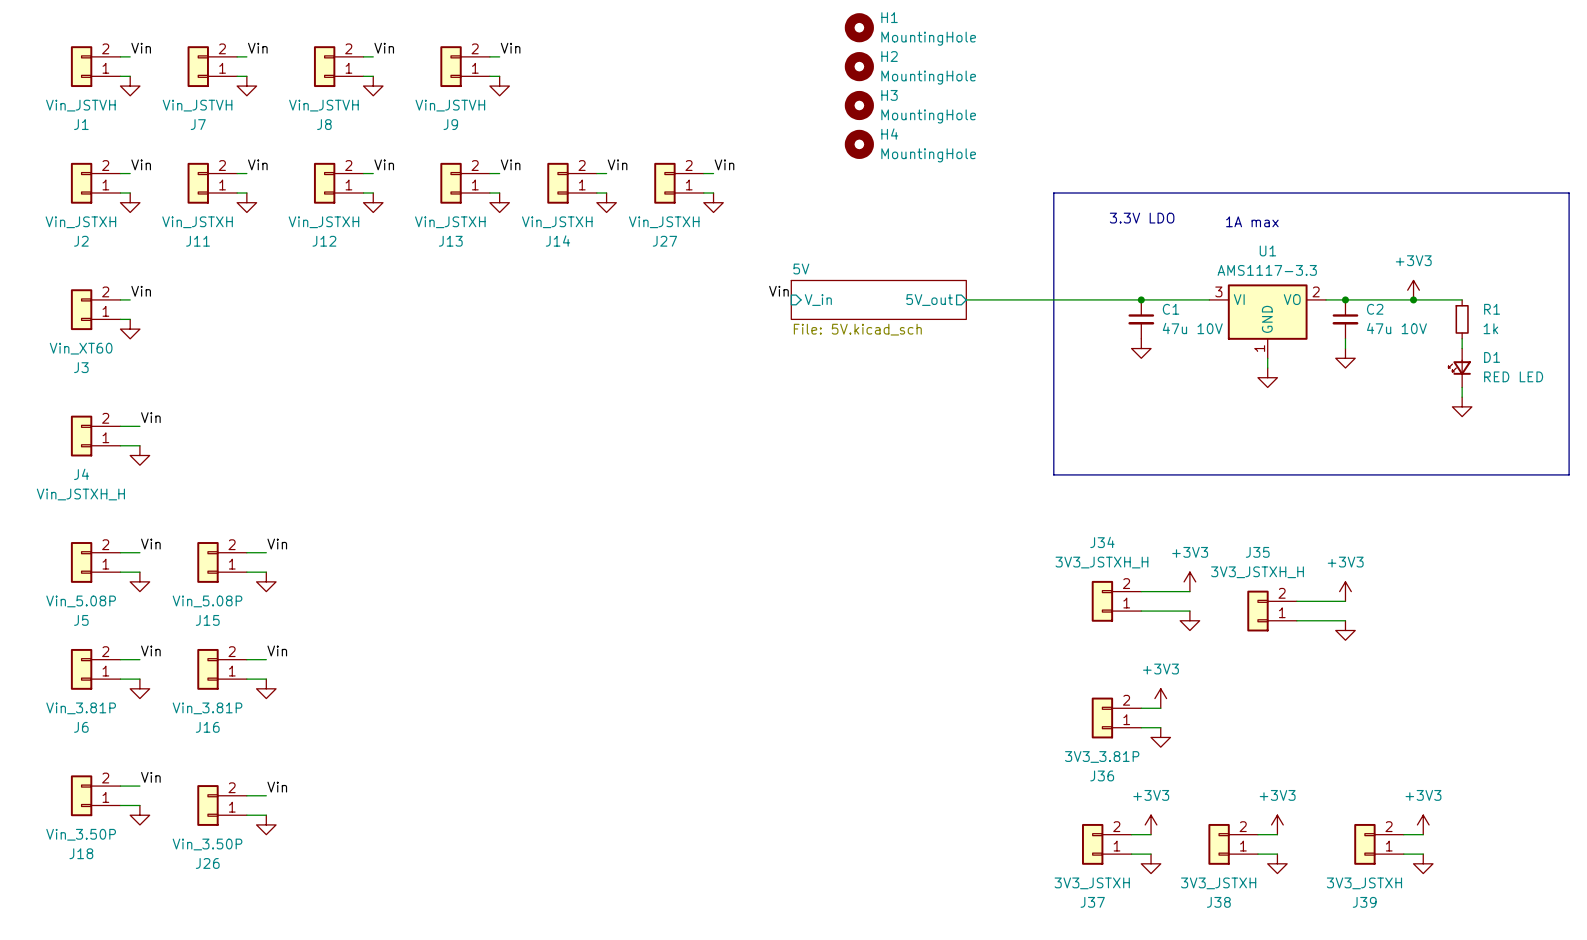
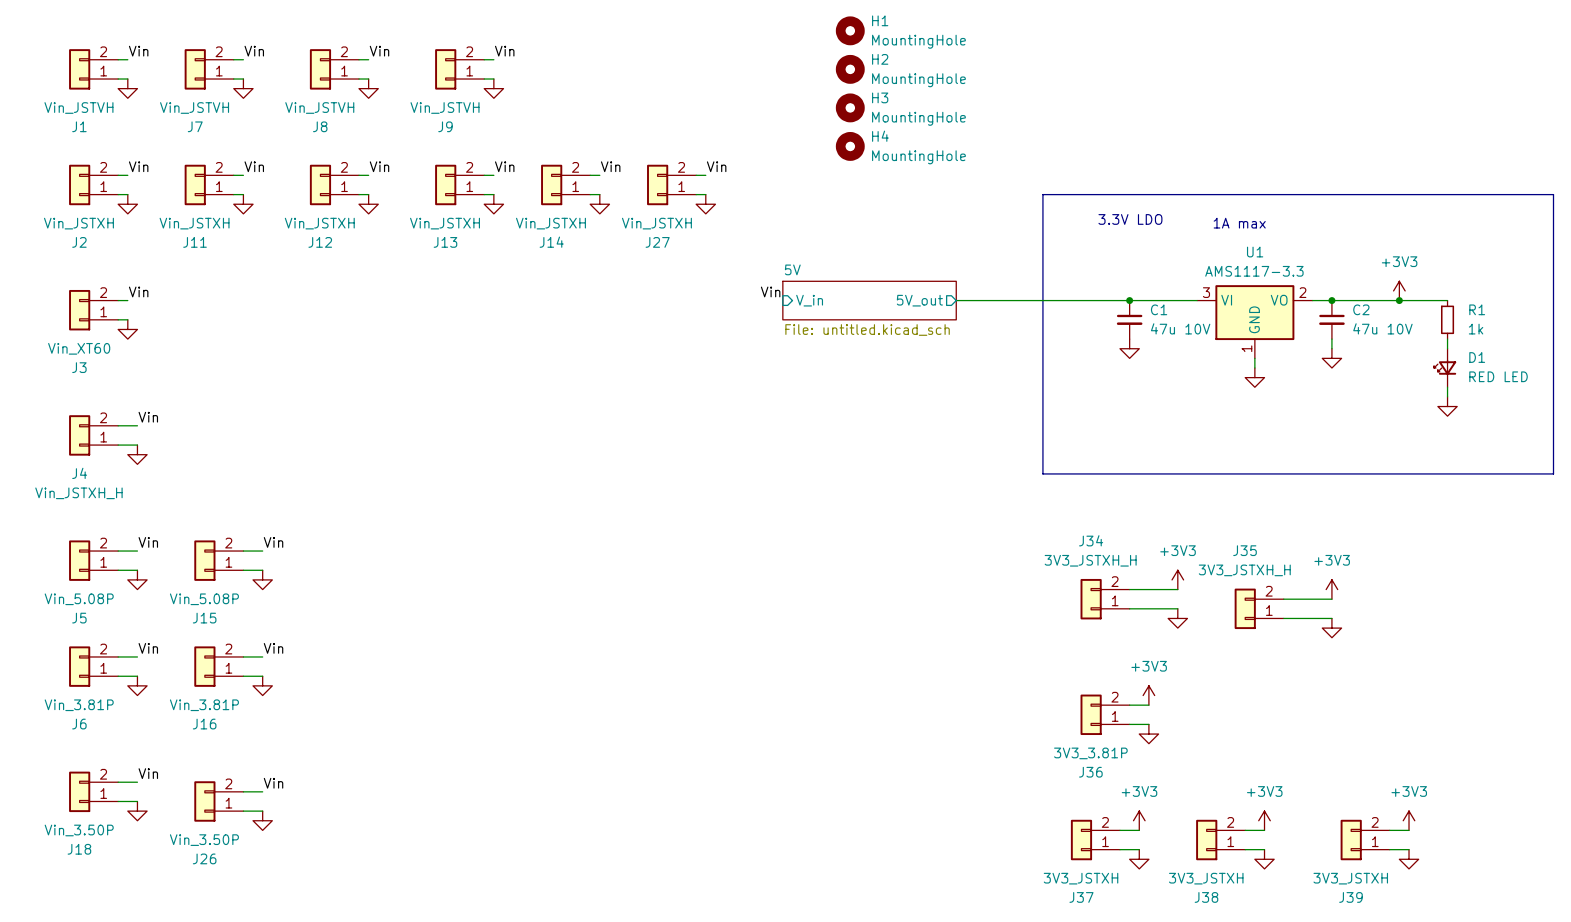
sheet 5V value: File: 5V.kicad_sch (857, 329) -> File: untitled.kicad_sch (867, 330)

